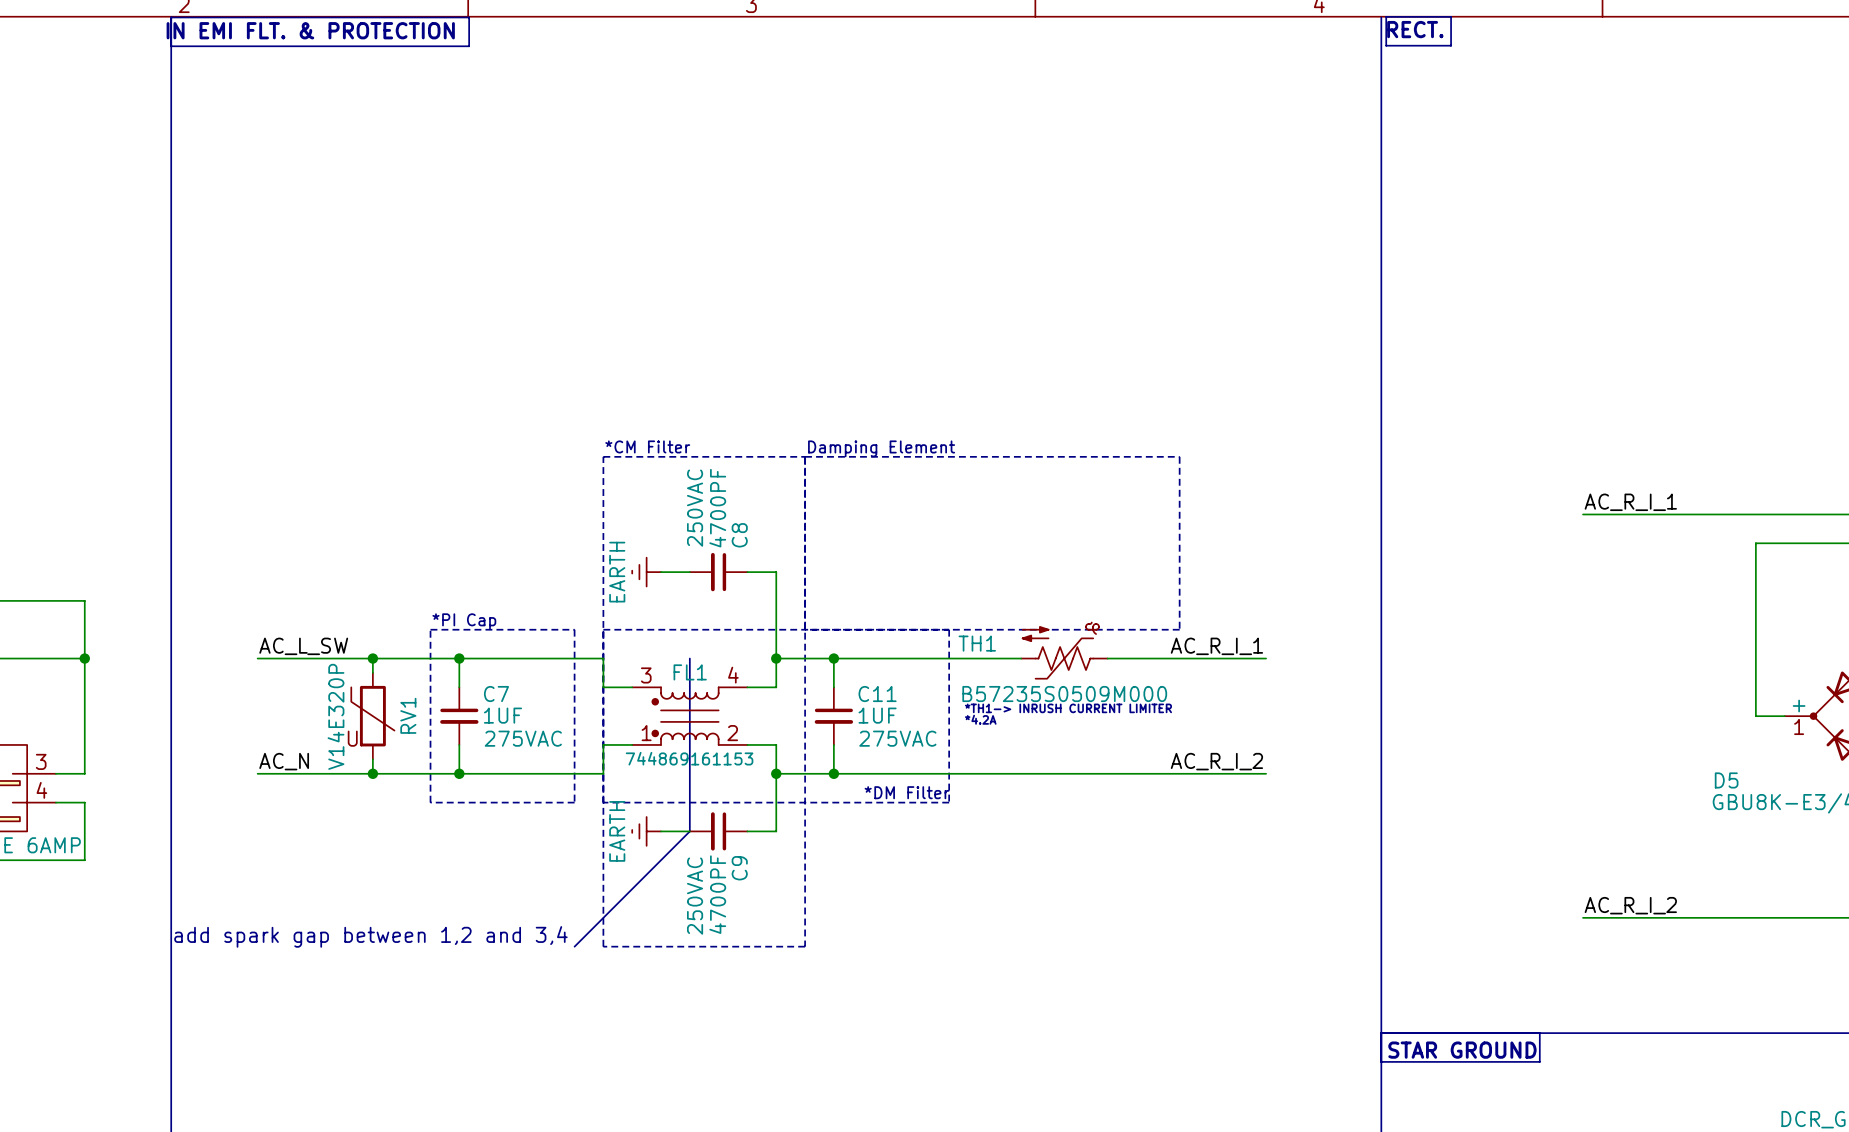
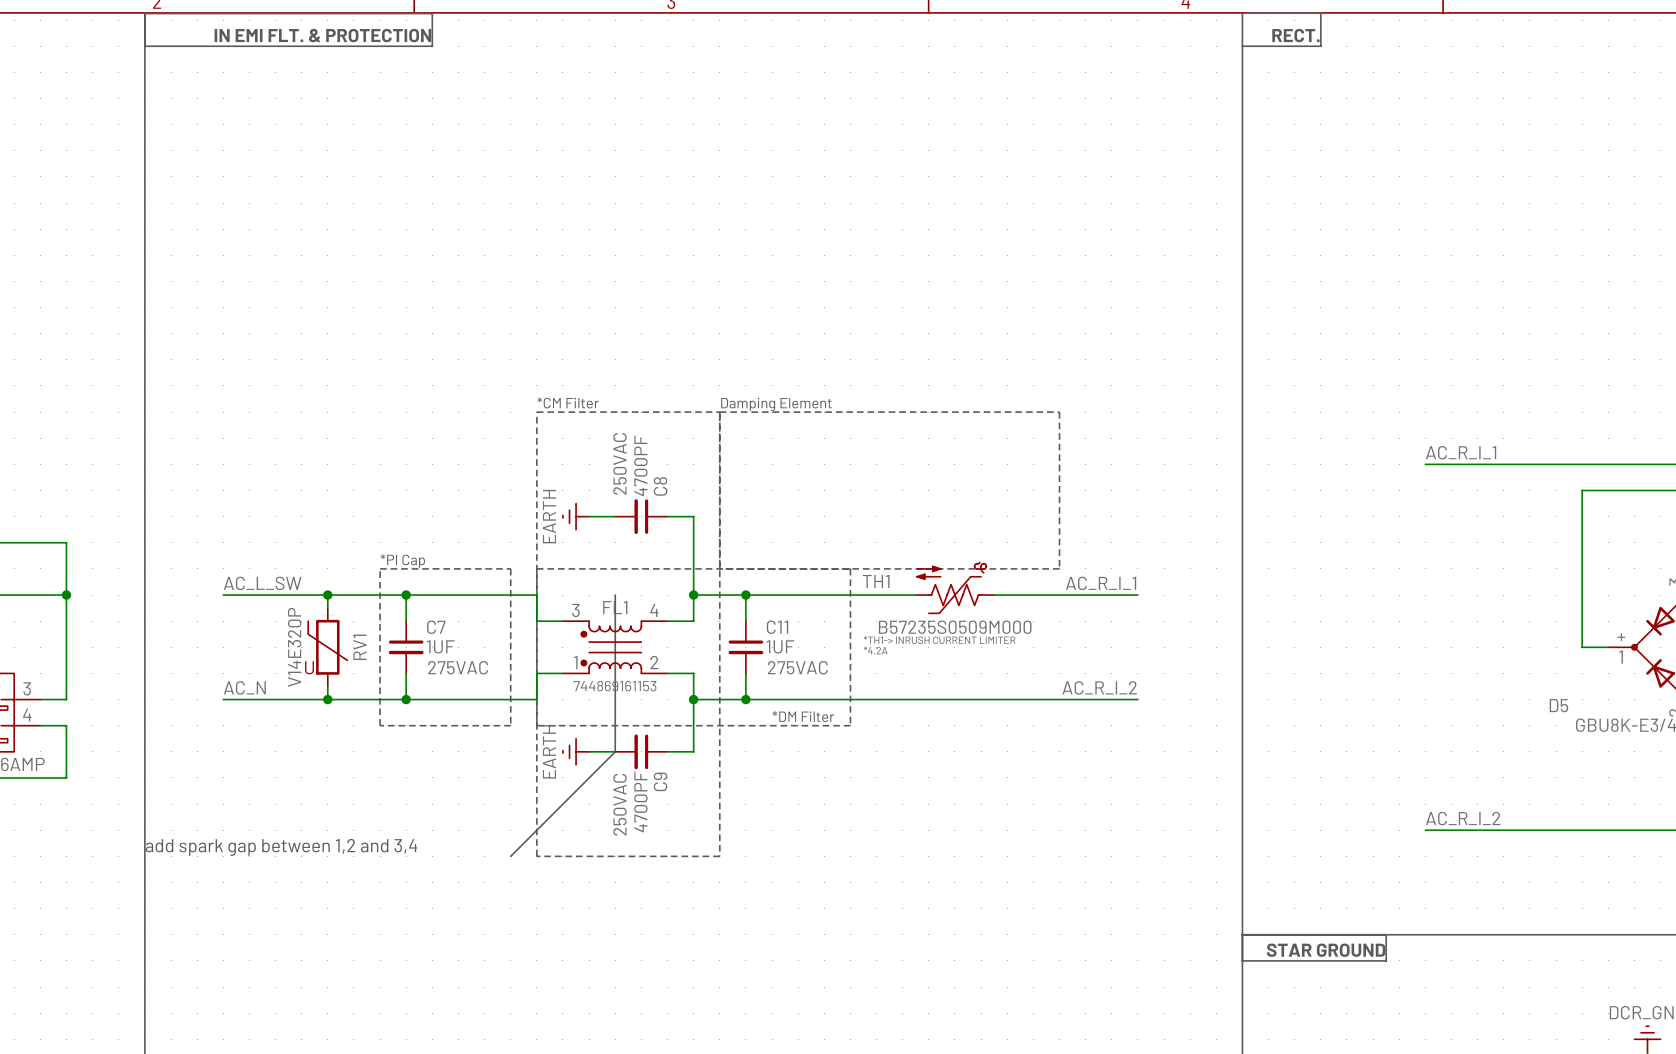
line: (1386, 16) (1386, 45) (1451, 45) (1451, 16) -> (1242, 46) (1320, 46) (1320, 13) (1305, 13)
line: (469, 17) (469, 46) (171, 46) -> (415, 13) (432, 13) (432, 46) (144, 46)
text position: RECT. (1415, 29) -> RECT. (1296, 35)
text position: IN EMI FLT. & PROTECTION (310, 30) -> IN EMI FLT. & PROTECTION (322, 35)

